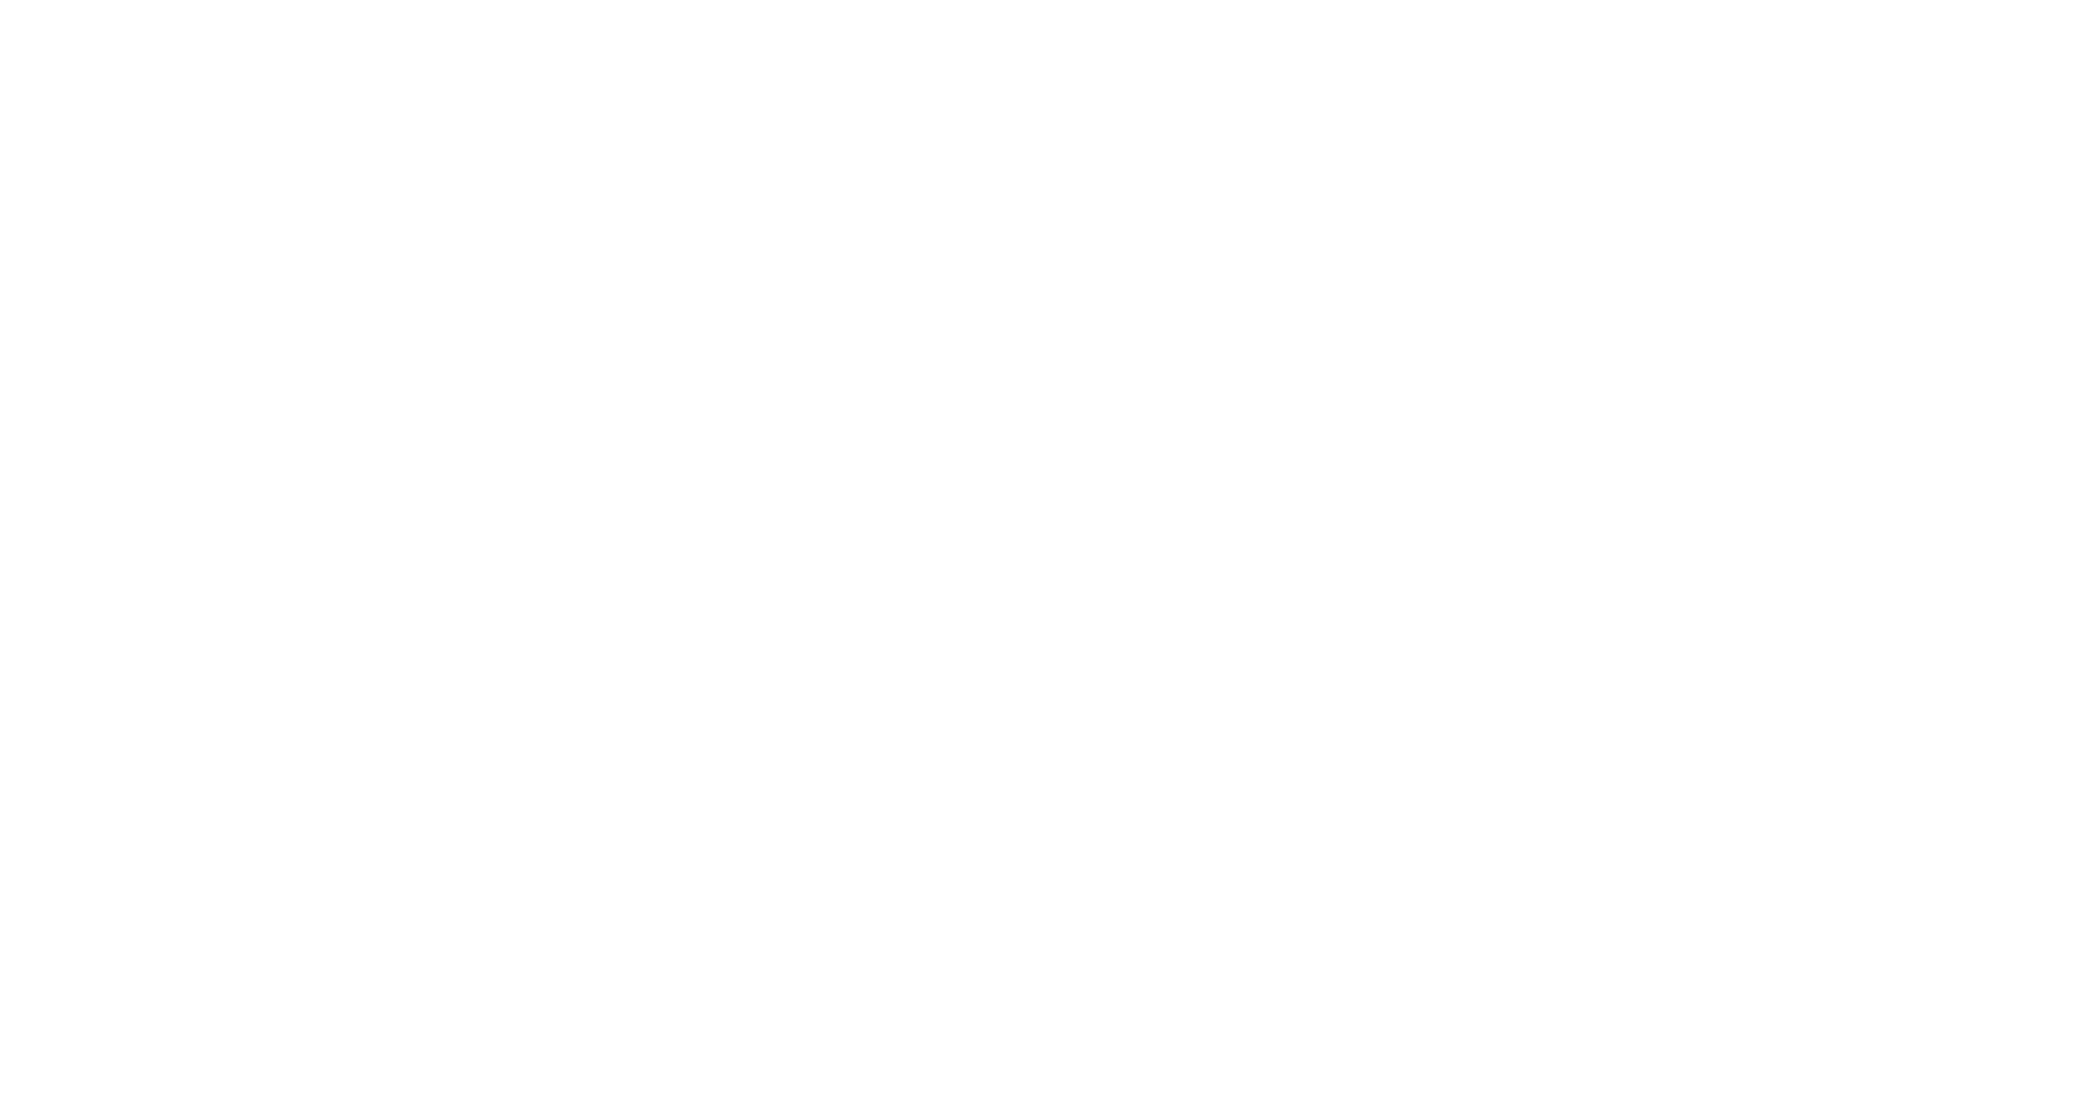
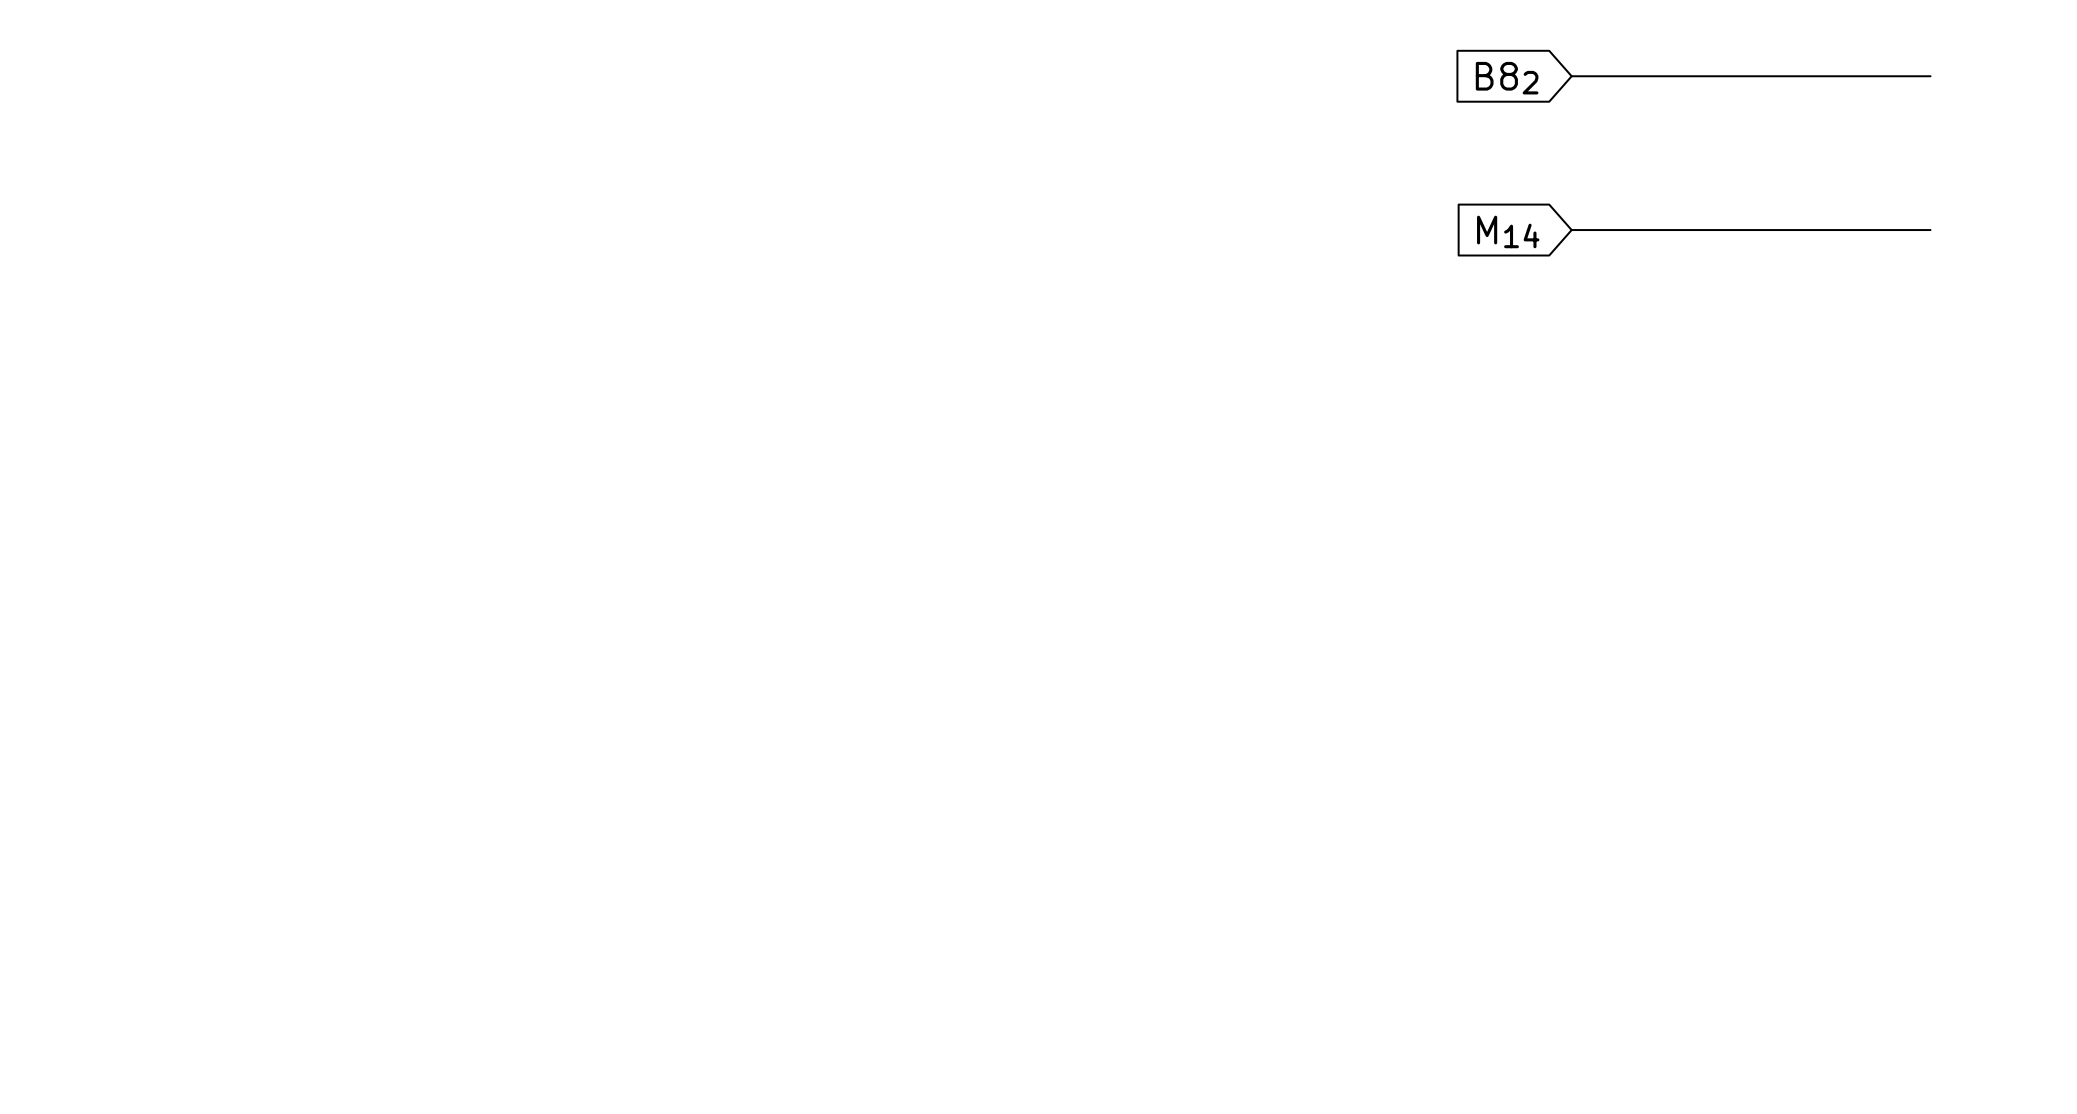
wire: none -> (1571, 76) (1930, 76)
global label: none -> B82 (1507, 78)
wire: none -> (1571, 230) (1930, 230)
global label: none -> M14 (1508, 231)

